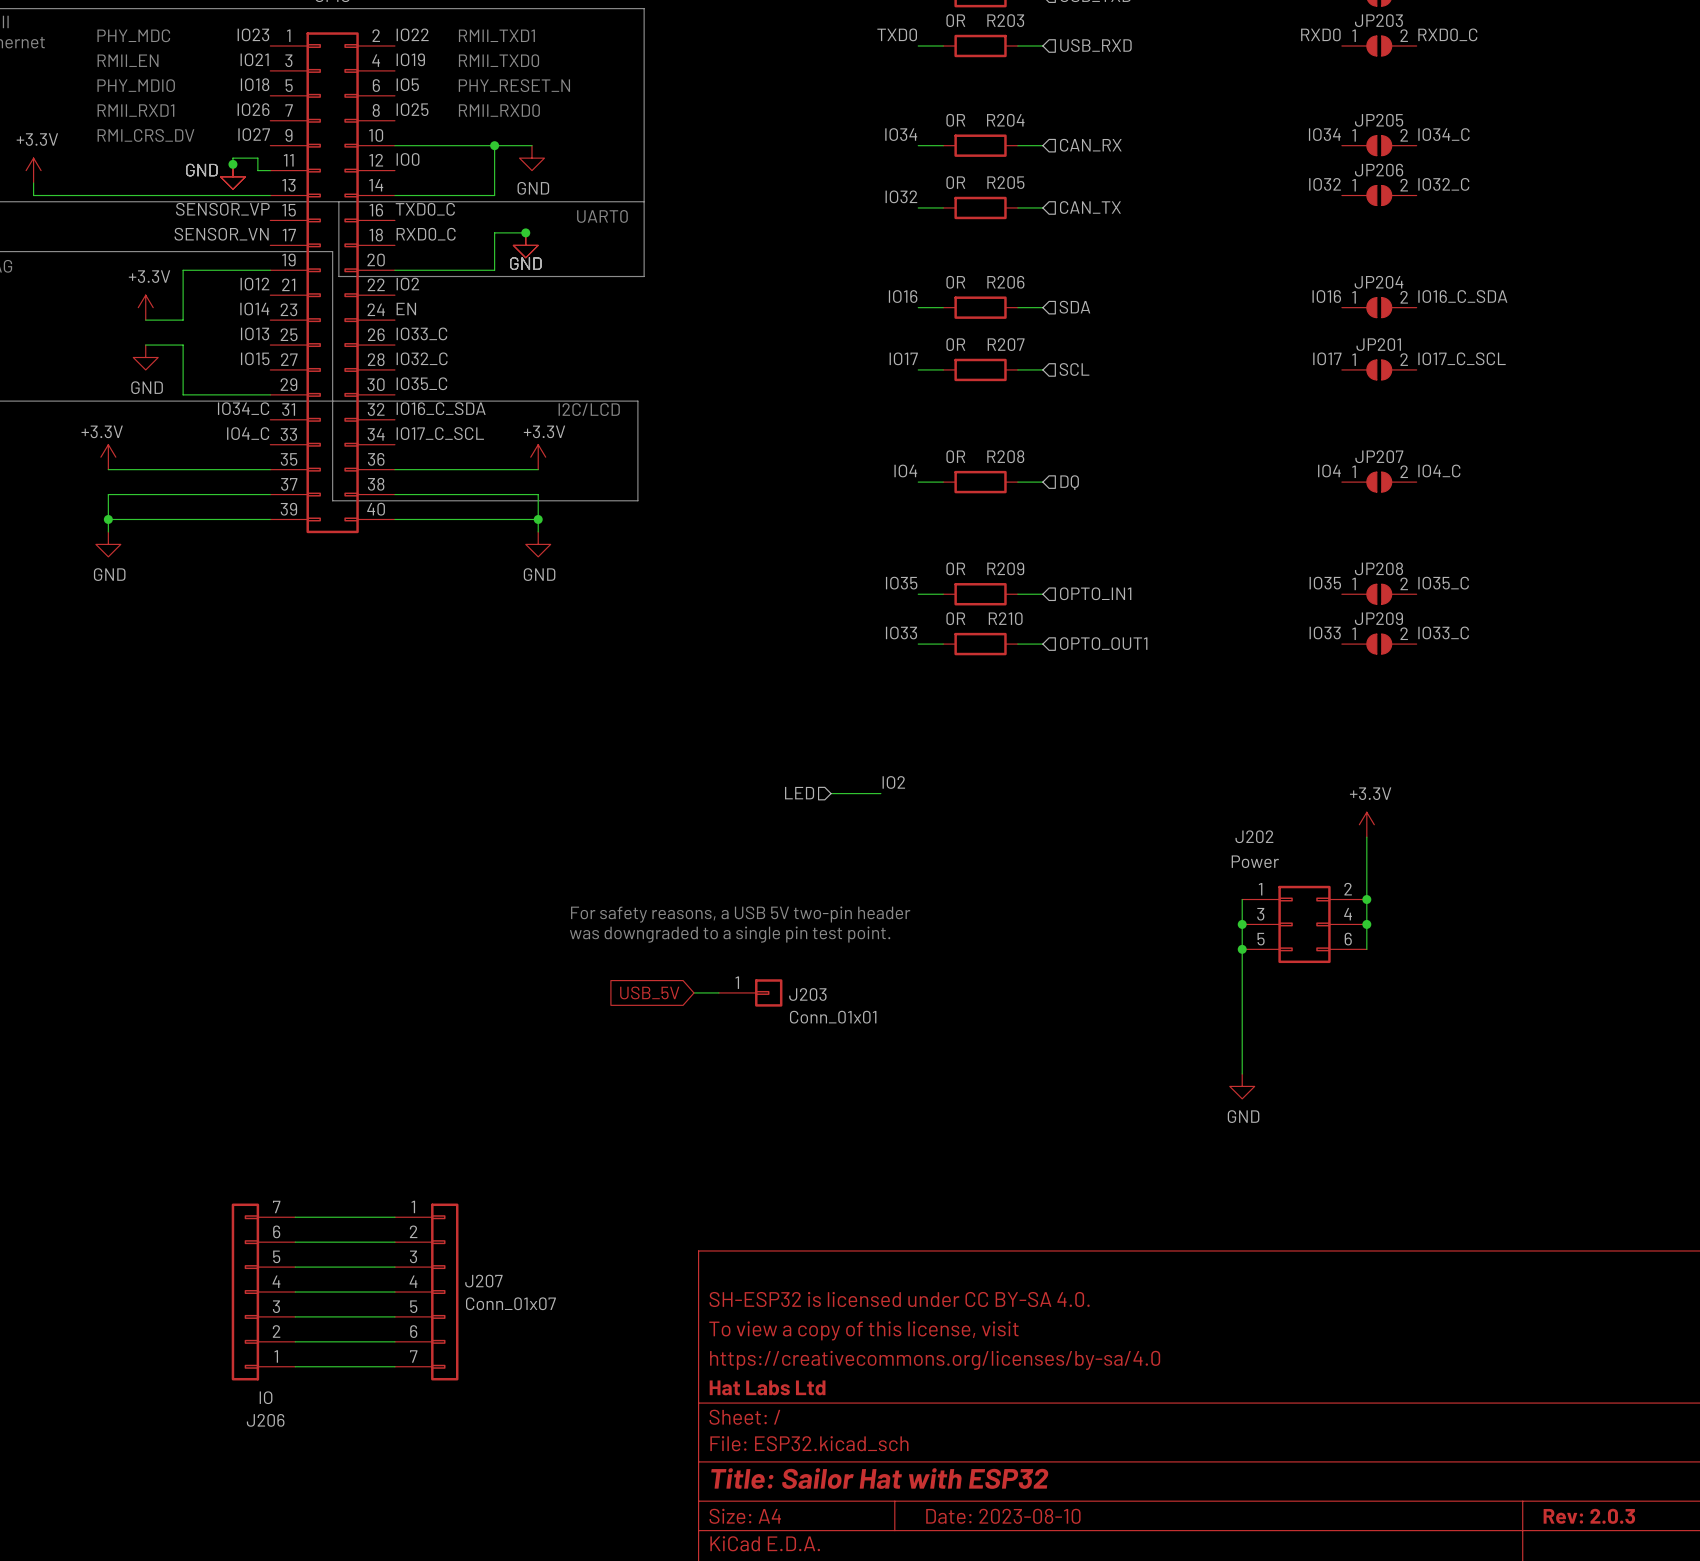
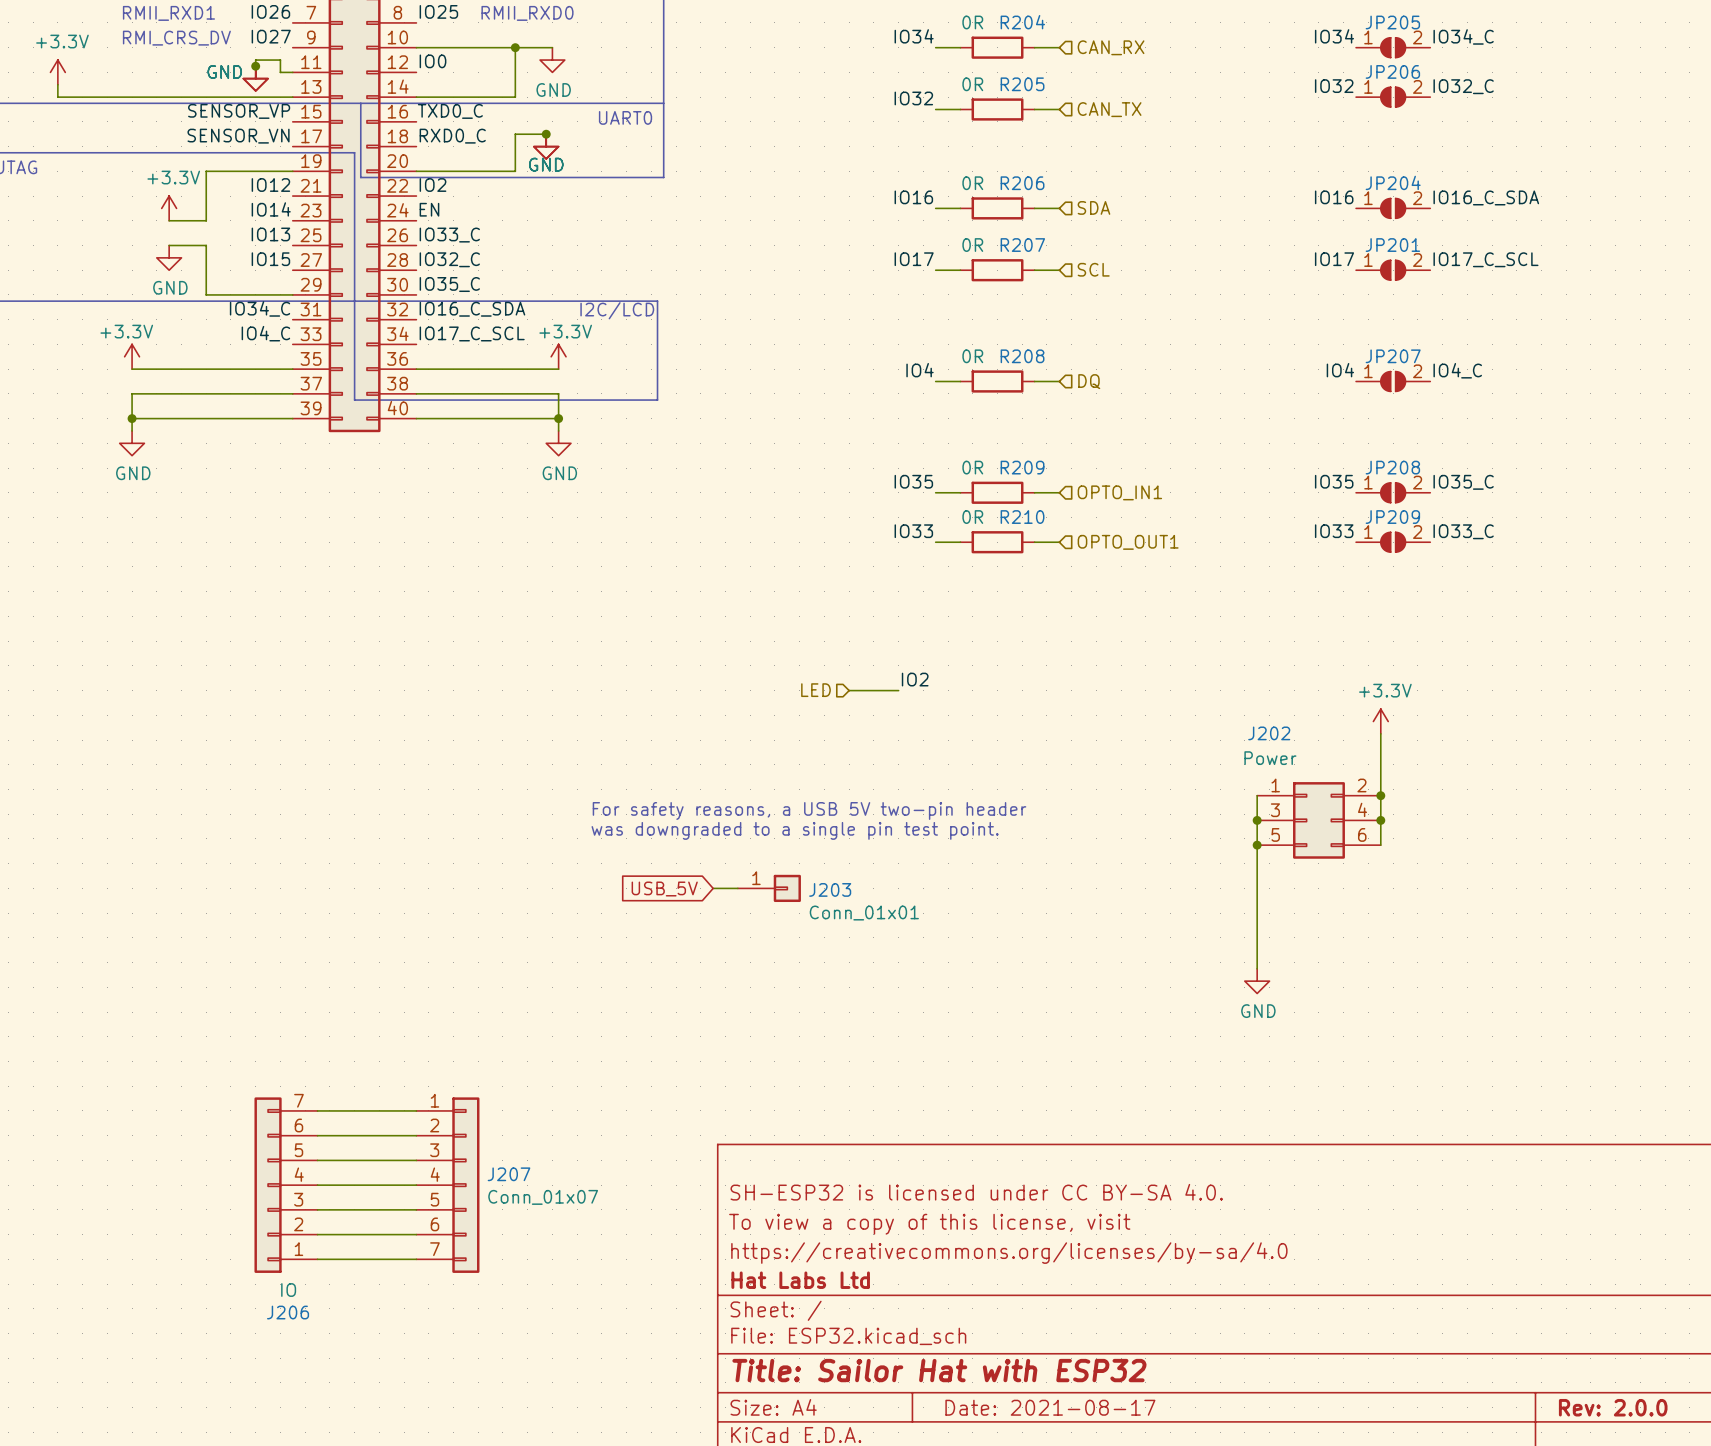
title block: Date: 2023-08-10 (1003, 1516) -> Date: 2021-08-17 (1050, 1407)
title block: Rev: 2.0.3 (1589, 1516) -> Rev: 2.0.0 (1613, 1407)

